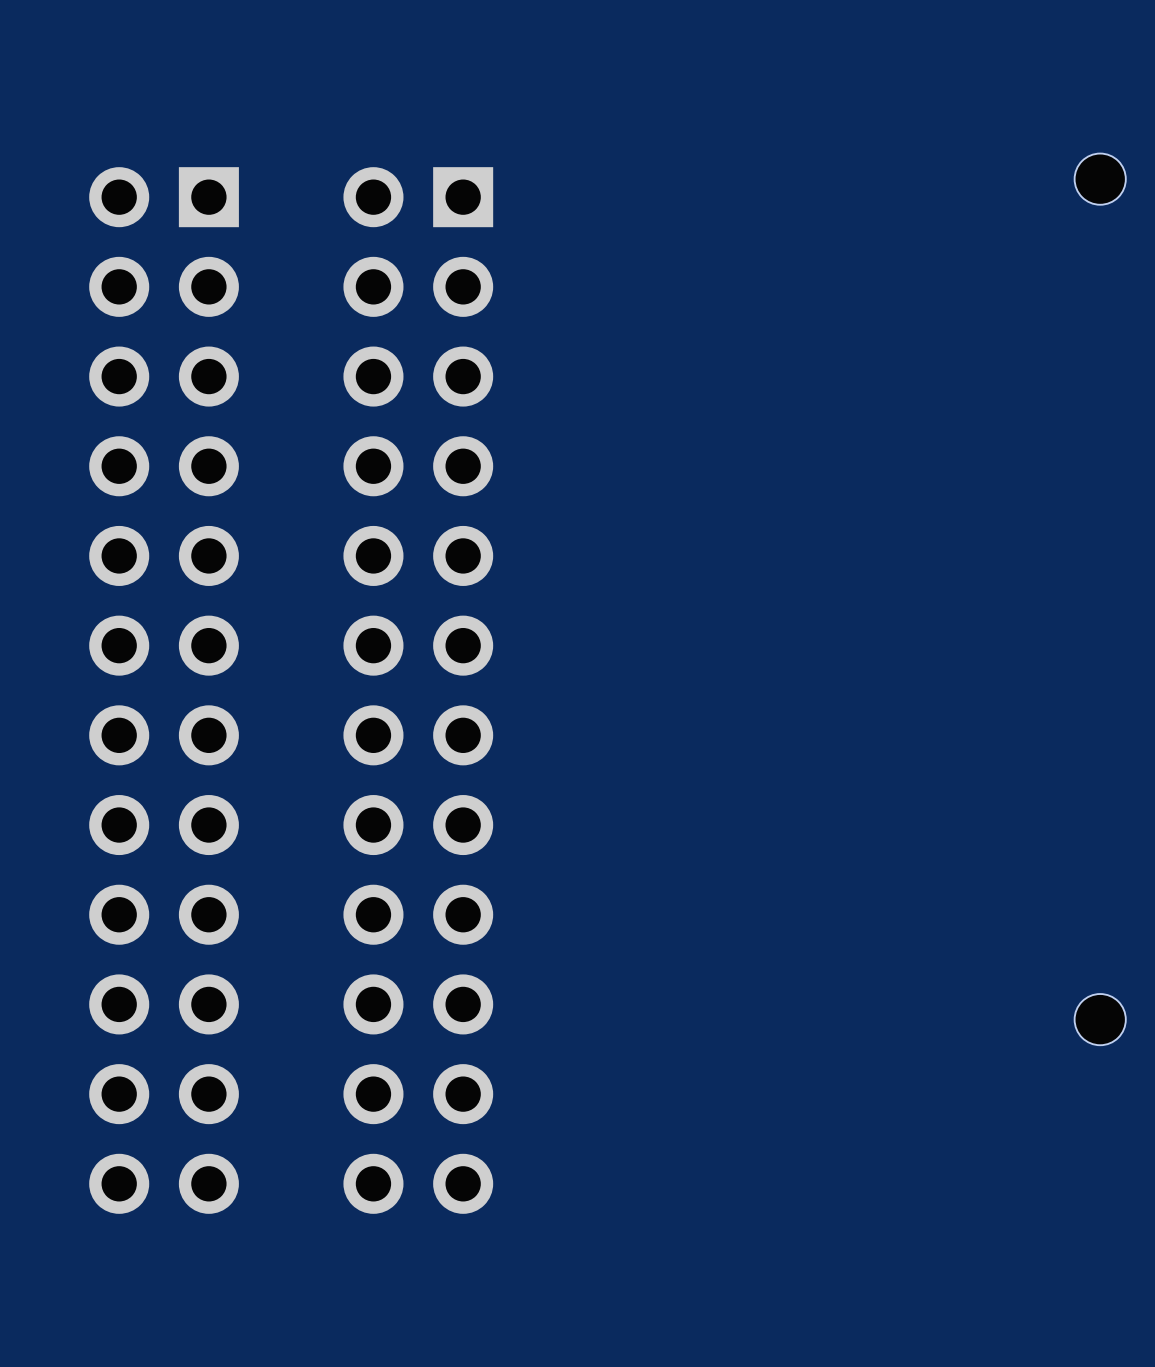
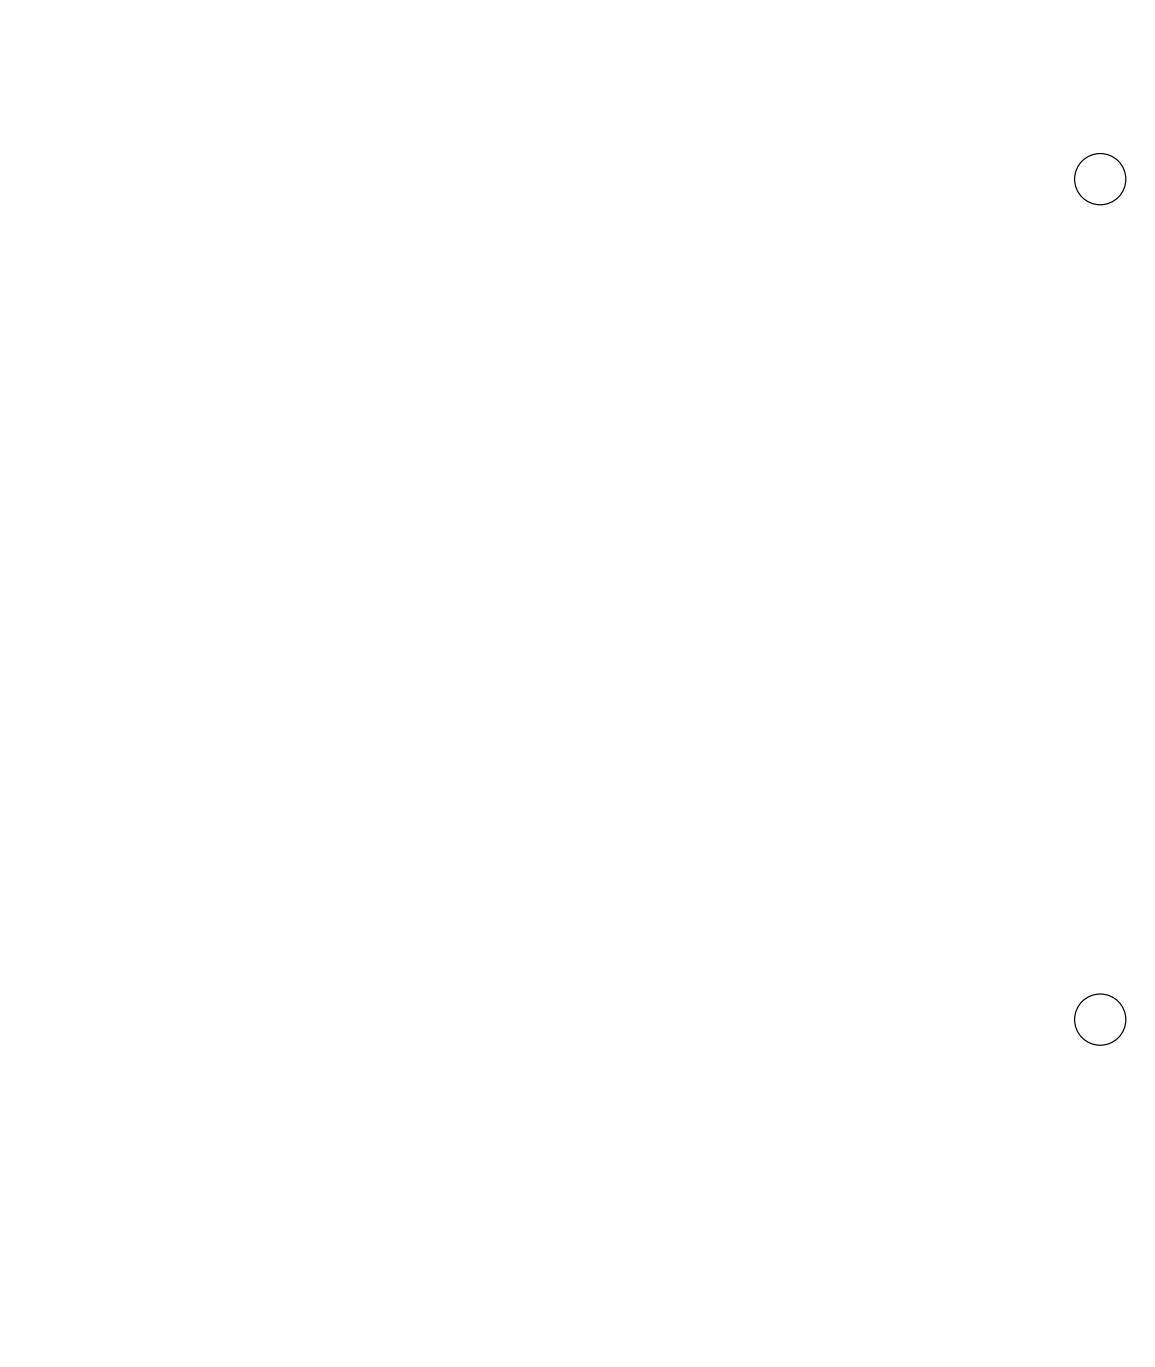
part: (164, 690) -> none
part: (418, 690) -> none

